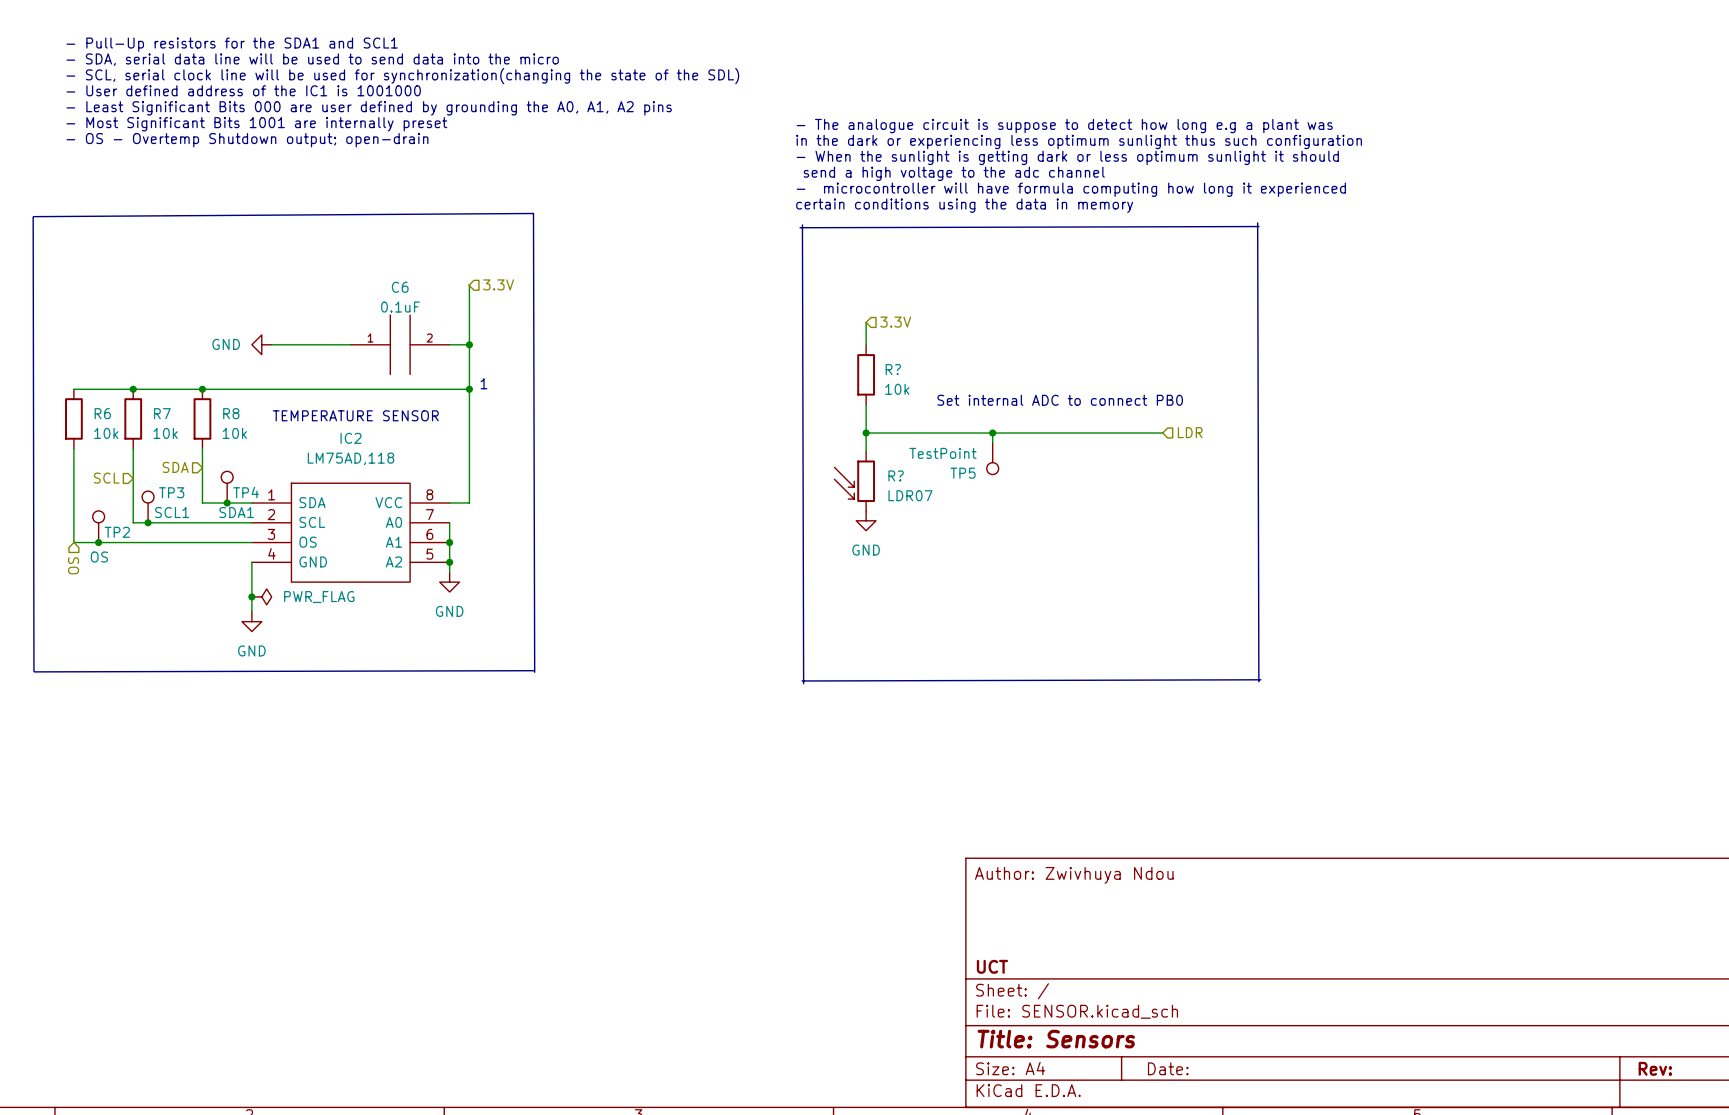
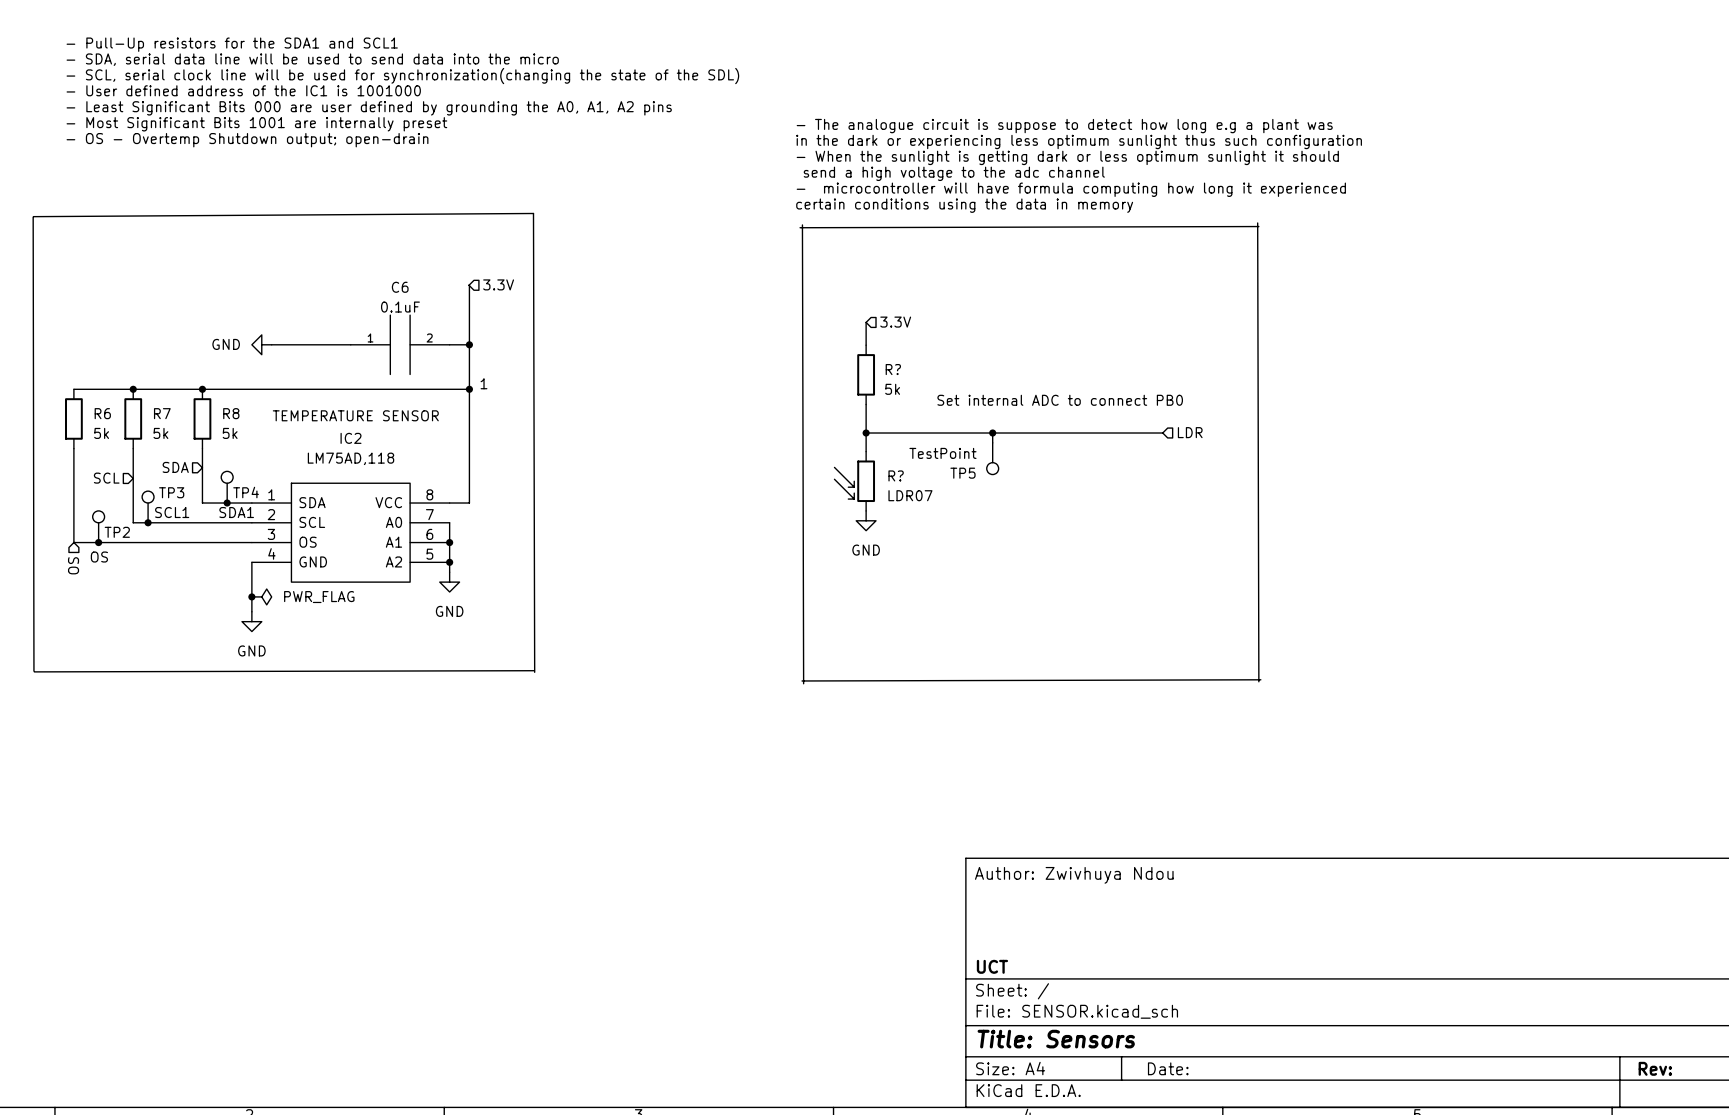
R? value: 10k (897, 389) -> 5k (892, 389)
R6 value: 10k (106, 433) -> 5k (101, 433)
R7 value: 10k (165, 433) -> 5k (160, 433)
R8 value: 10k (234, 433) -> 5k (230, 433)

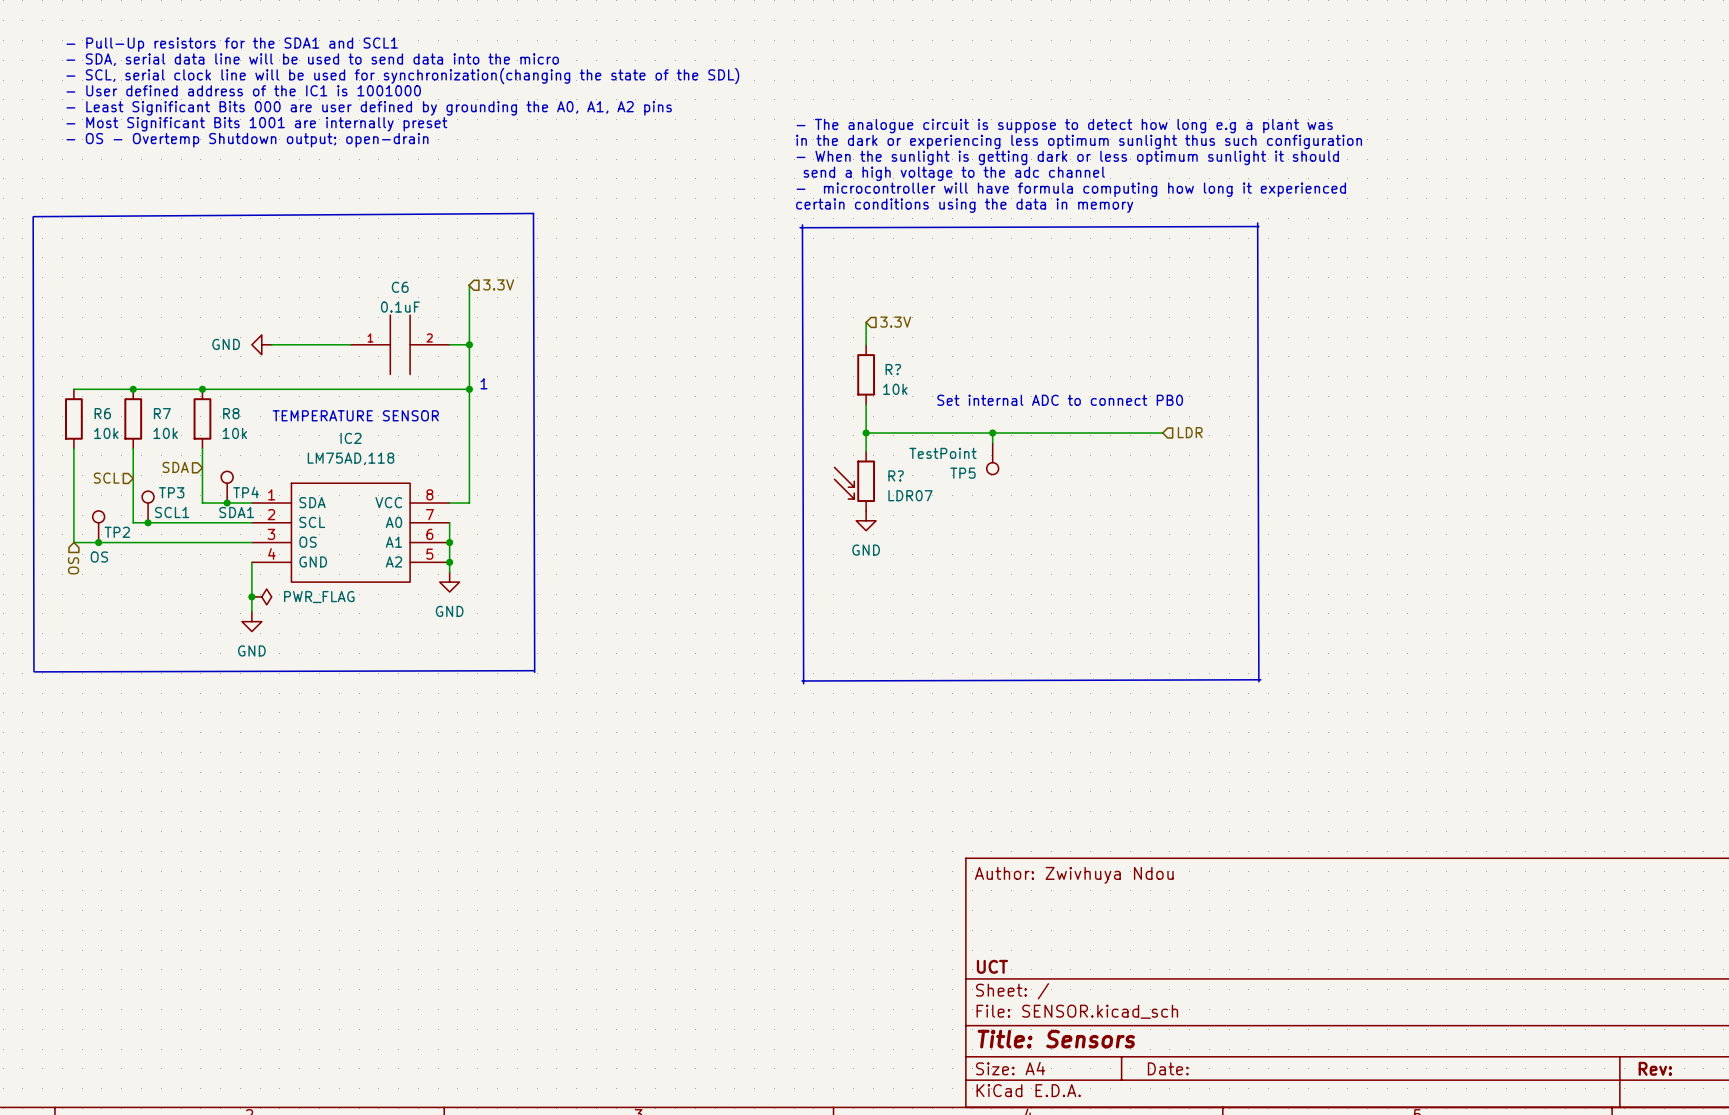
R? value: 5k (892, 389) -> 10k (895, 389)
R6 value: 5k (101, 433) -> 10k (106, 433)
R7 value: 5k (160, 433) -> 10k (165, 433)
R8 value: 5k (230, 433) -> 10k (234, 433)

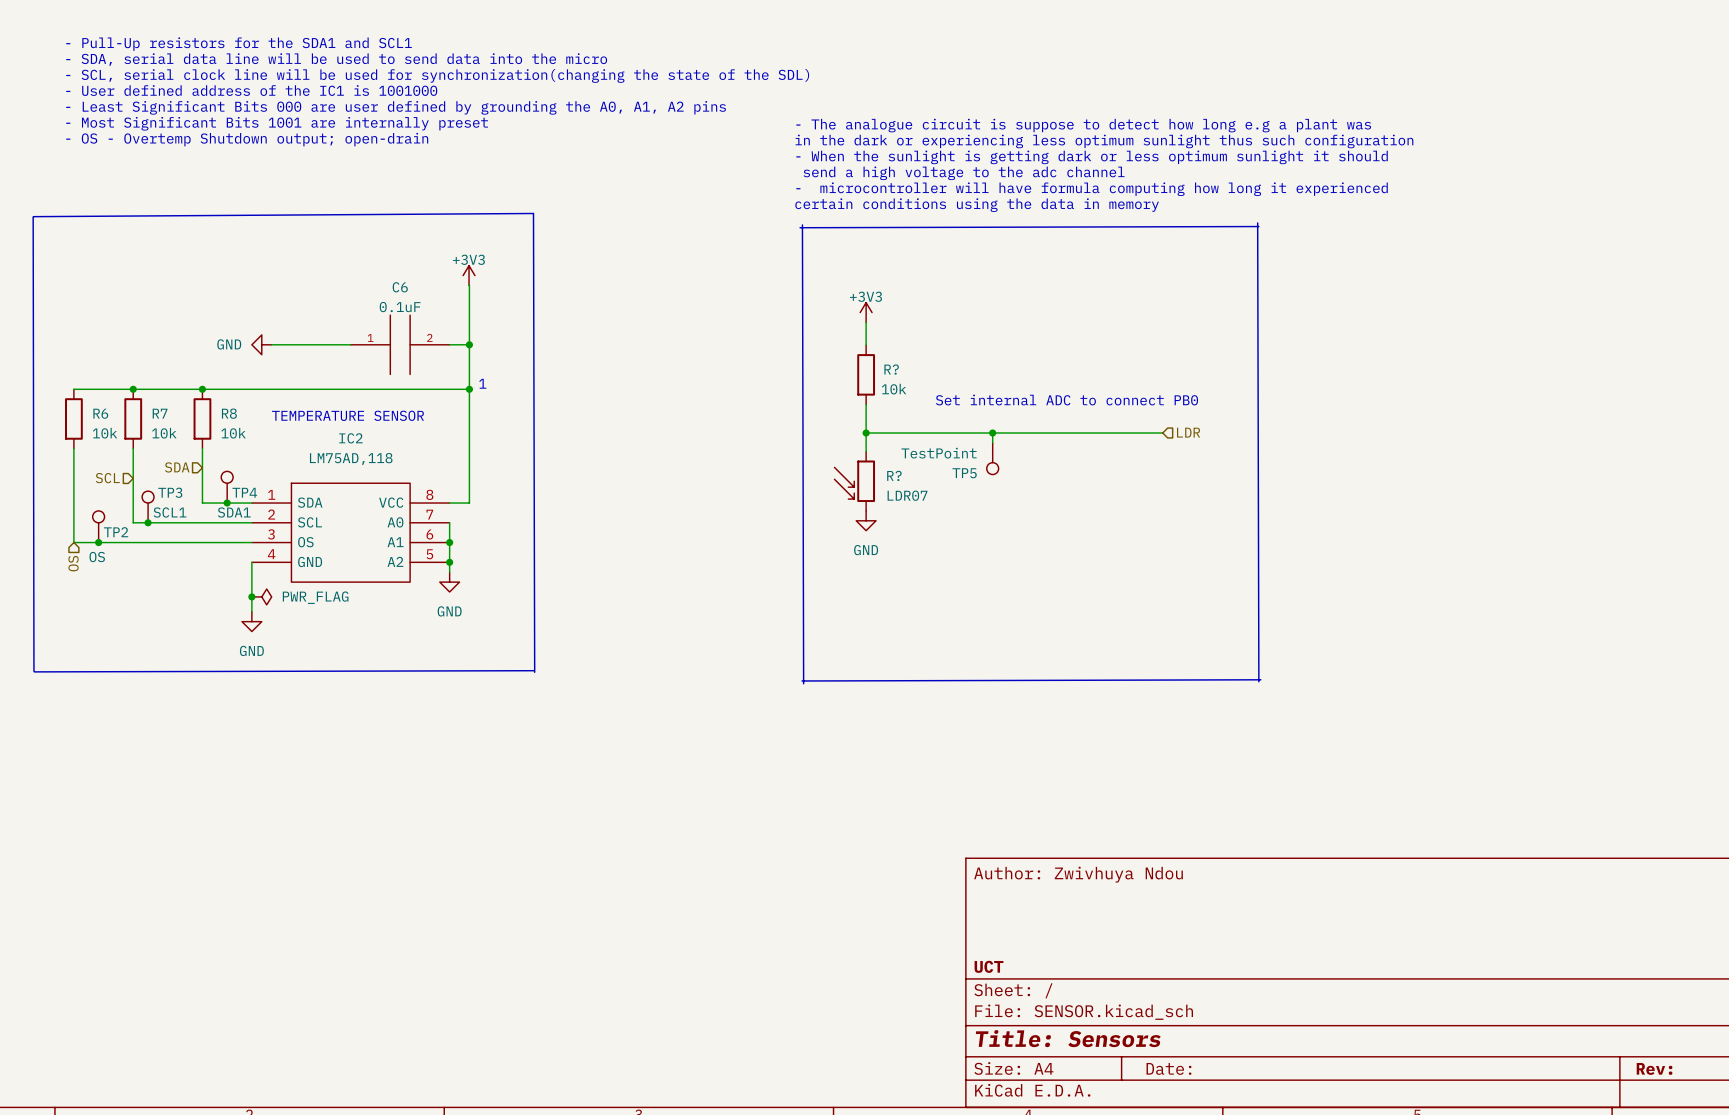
power symbol: none -> +3V3 (469, 275)
hierarchical label: 3.3V (498, 284) -> none
power symbol: none -> +3V3 (866, 312)
hierarchical label: 3.3V (895, 322) -> none

